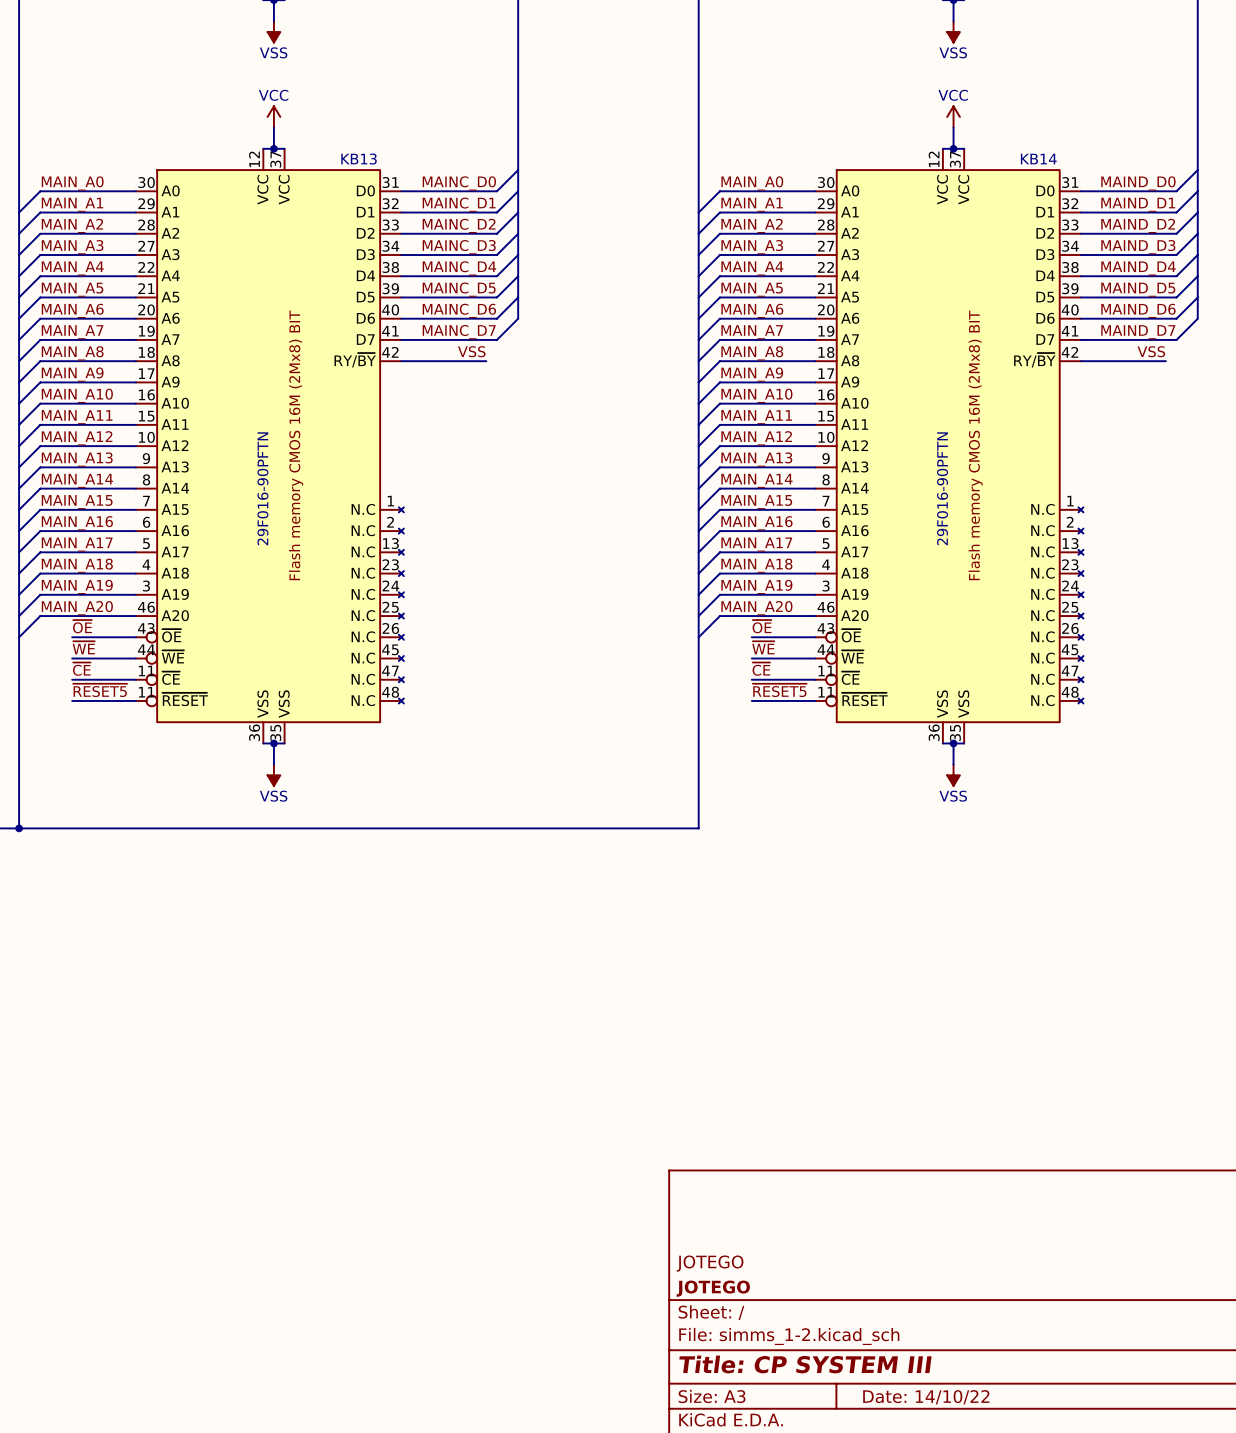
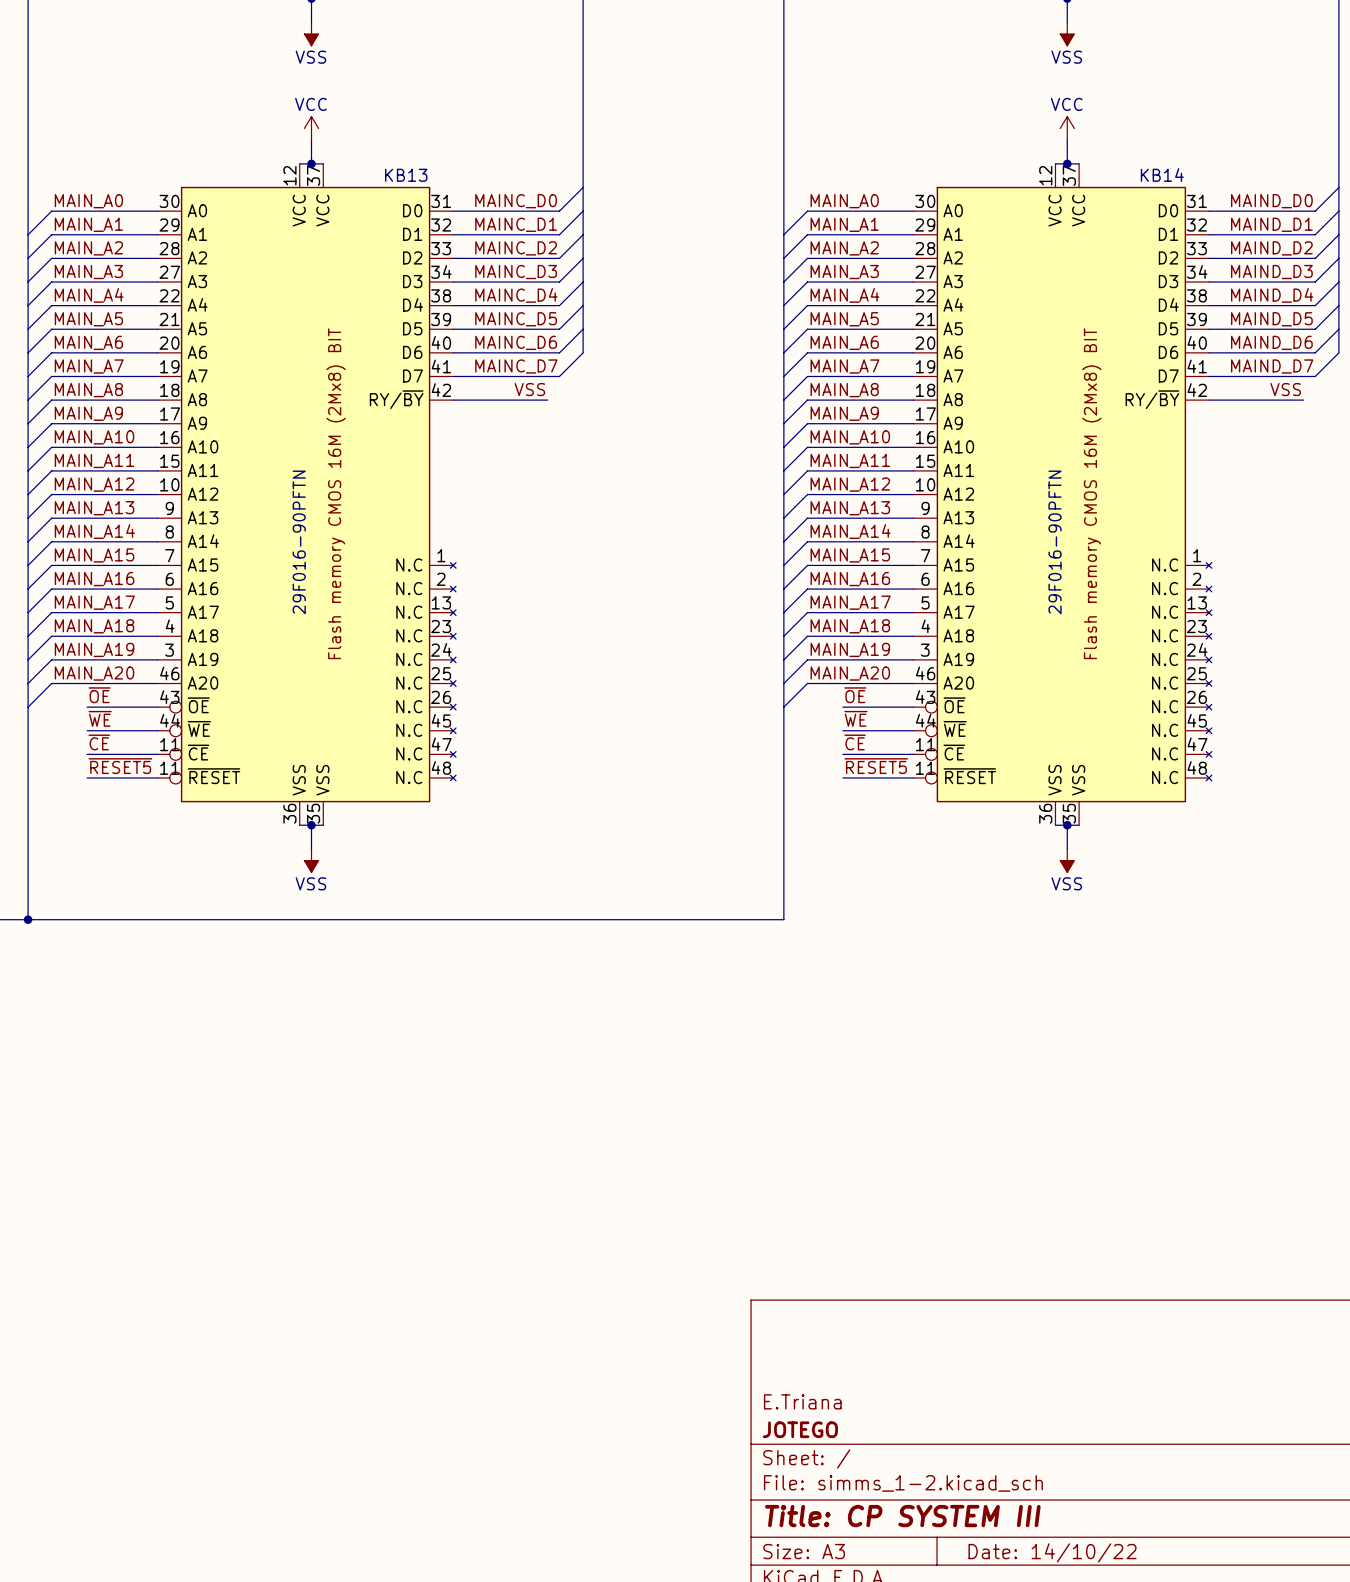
title block: JOTEGO (710, 1263) -> E.Triana (802, 1401)

